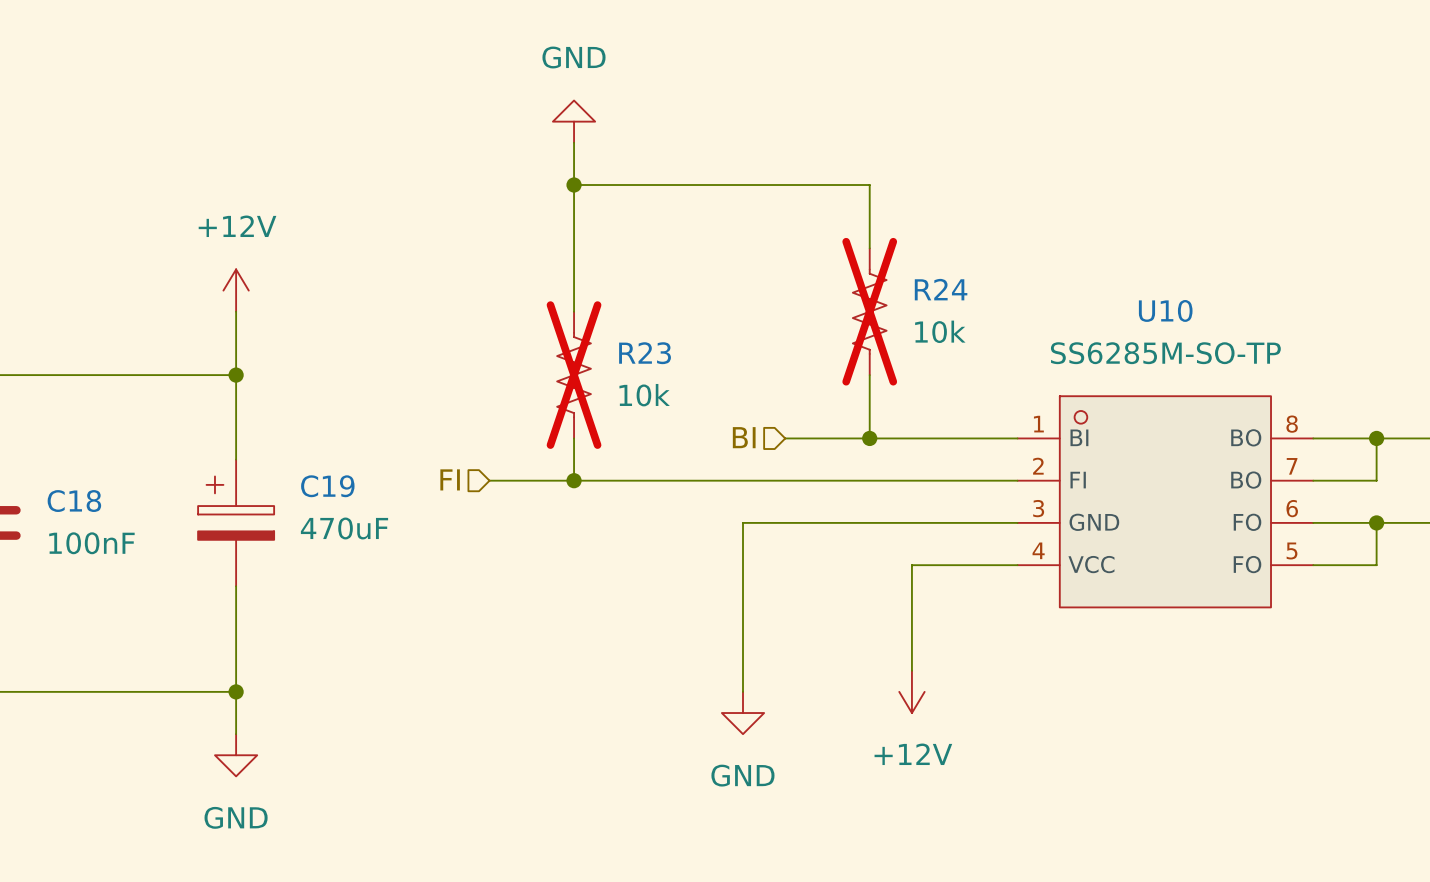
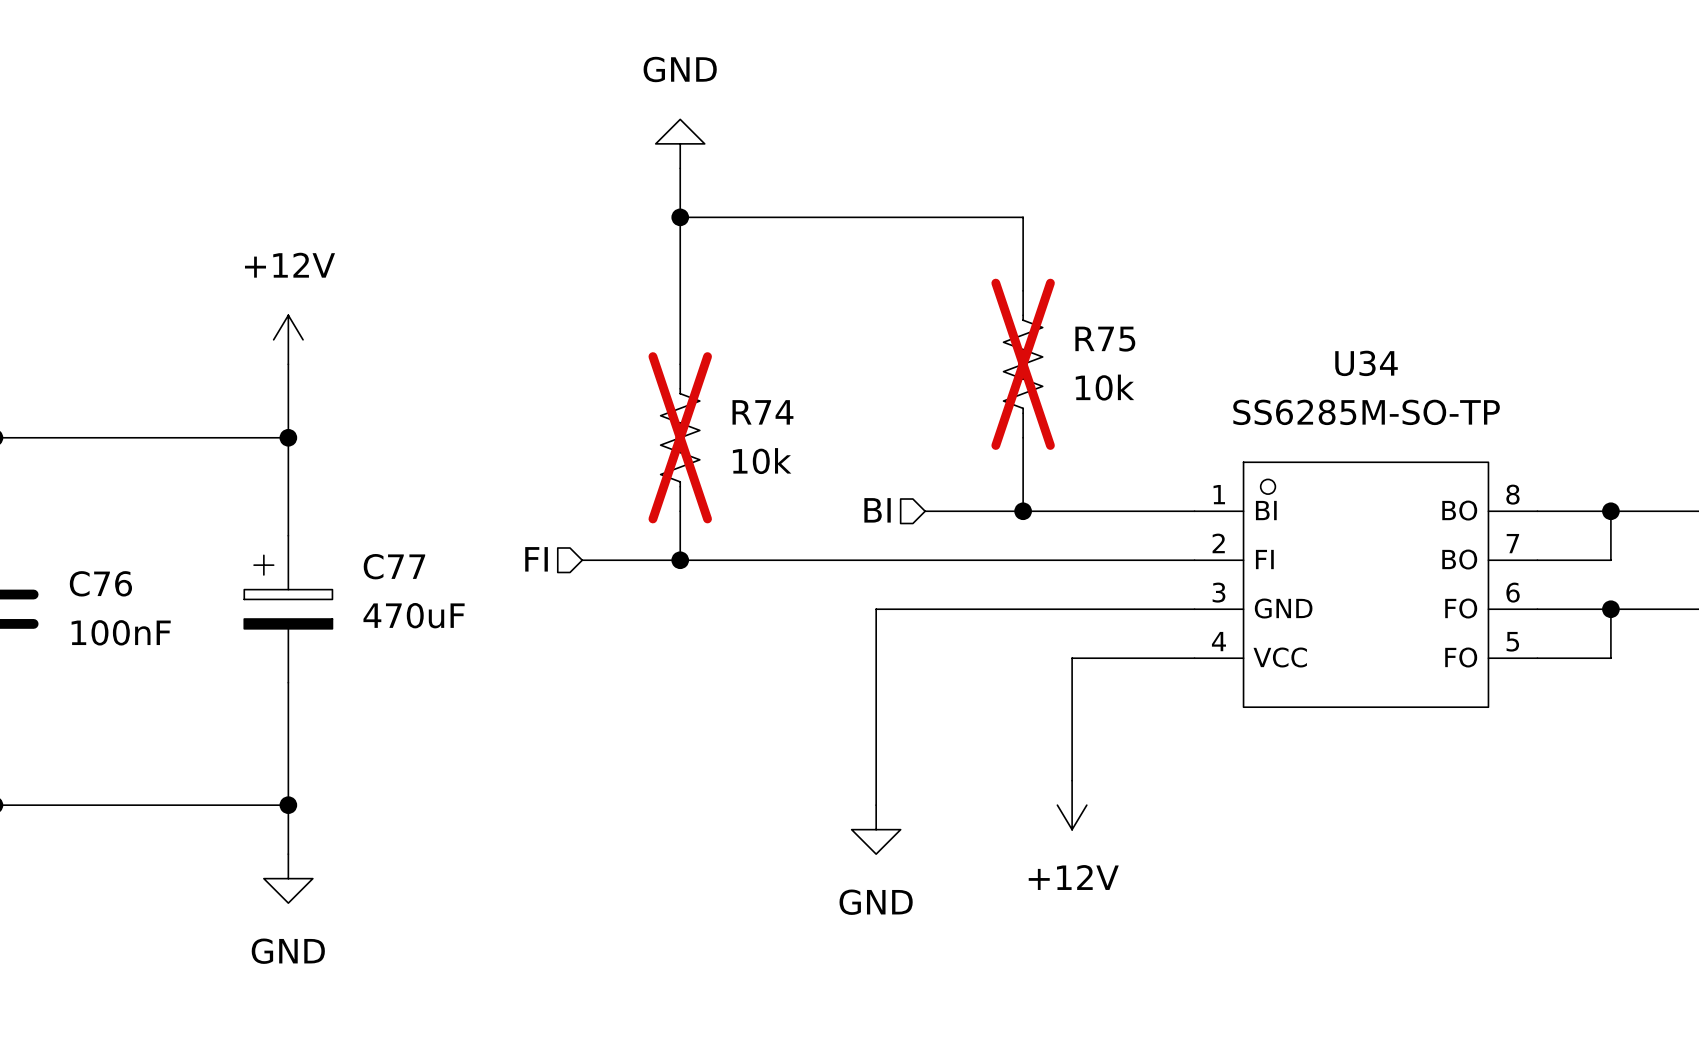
R24 name: R24 (941, 289) -> R75 (1105, 339)
U10 name: U10 (1165, 310) -> U34 (1366, 363)
R23 name: R23 (645, 353) -> R74 (762, 412)
C19 name: C19 (327, 486) -> C77 (394, 566)
C18 name: C18 (74, 501) -> C76 (100, 583)

